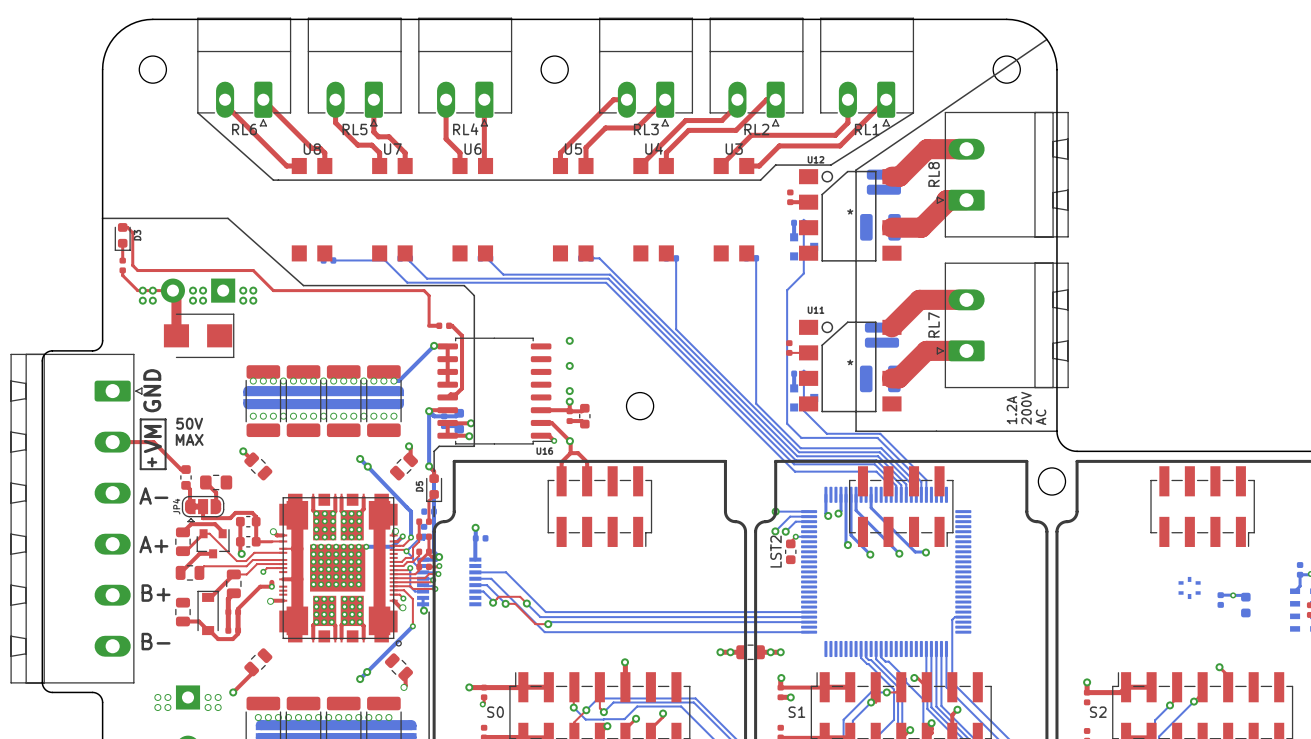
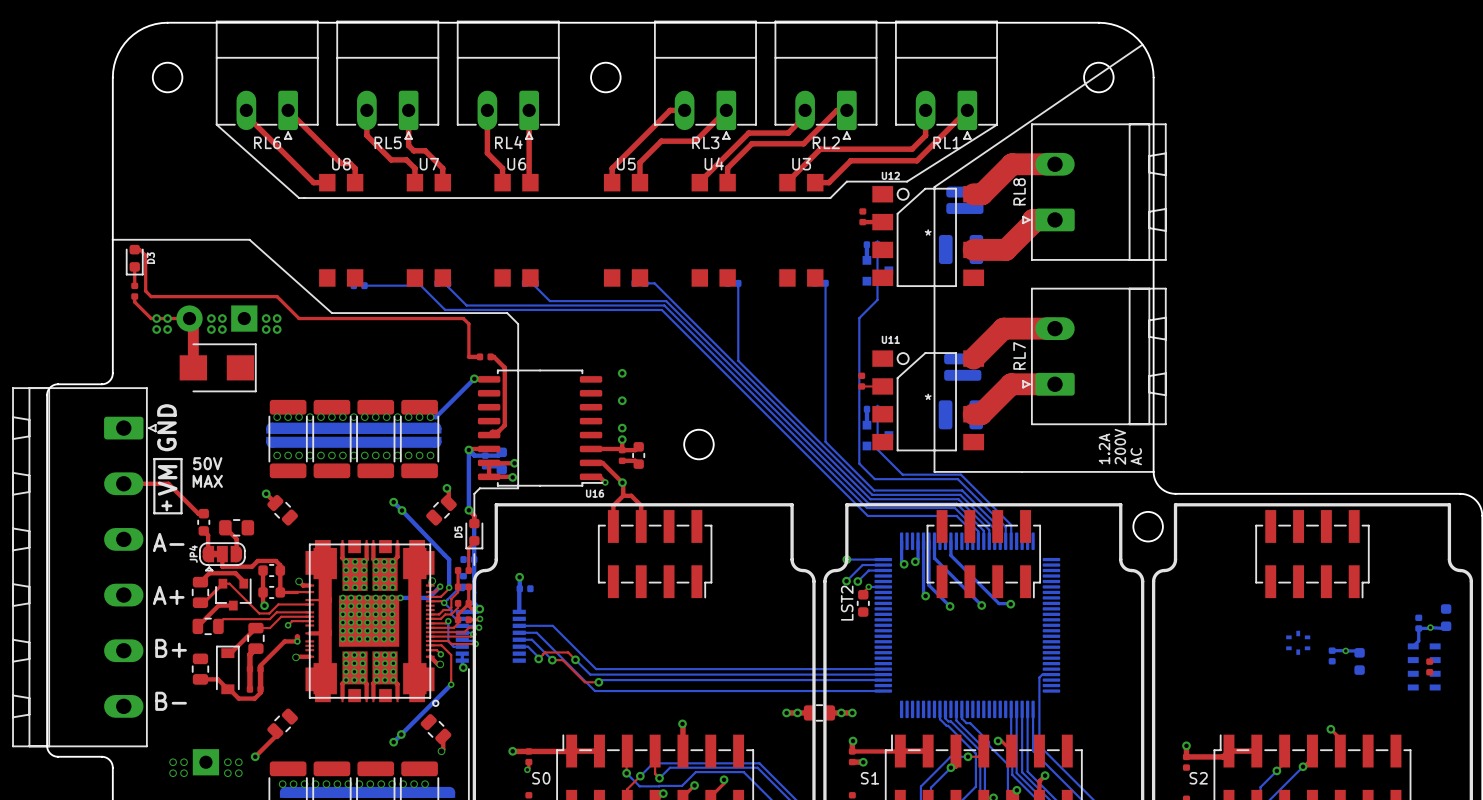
top track: (447, 346) (447, 384) -> none

